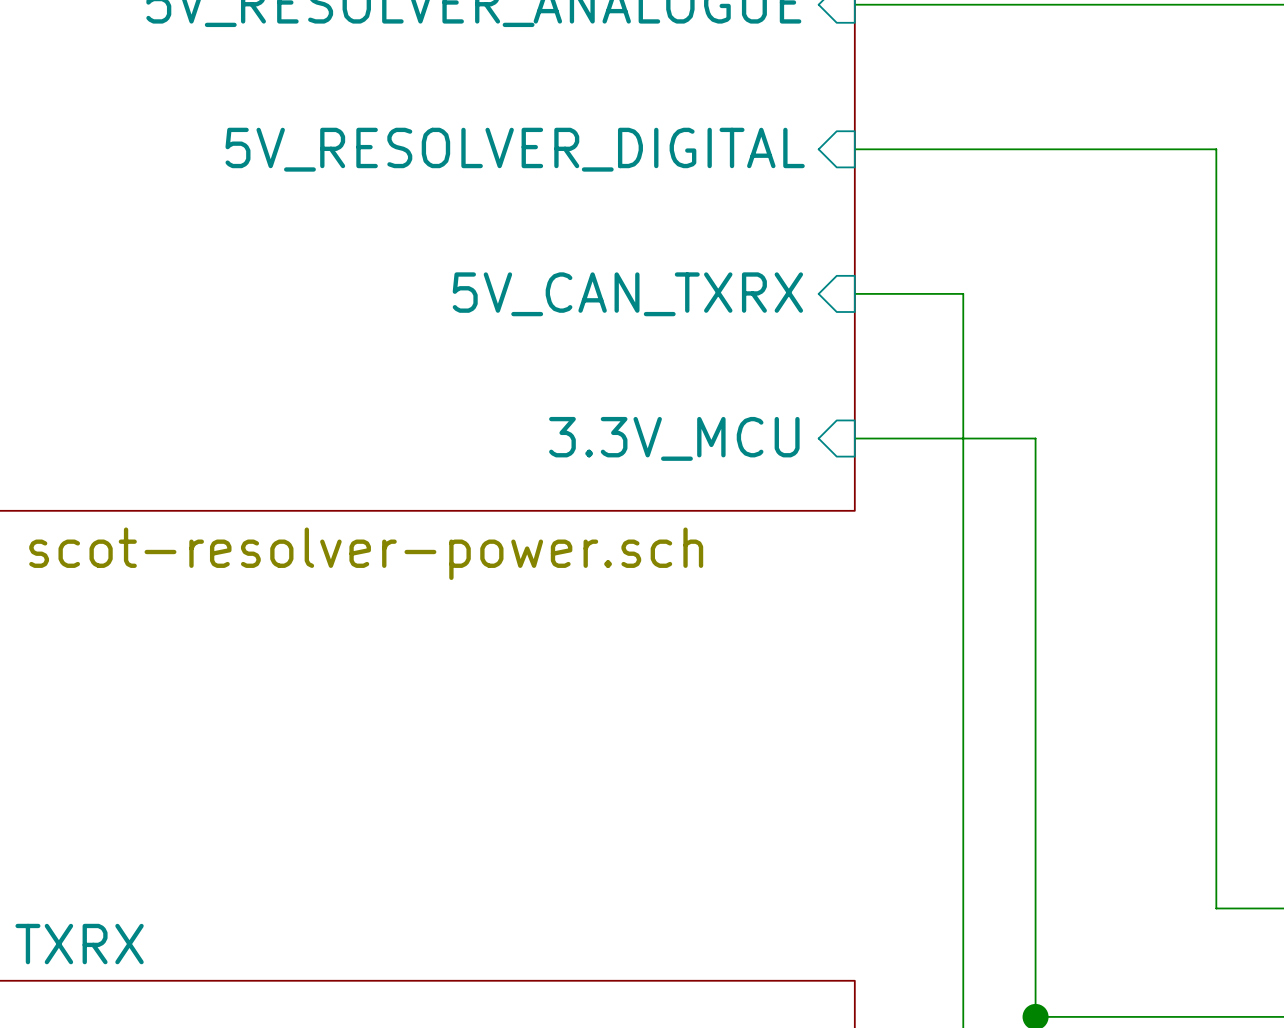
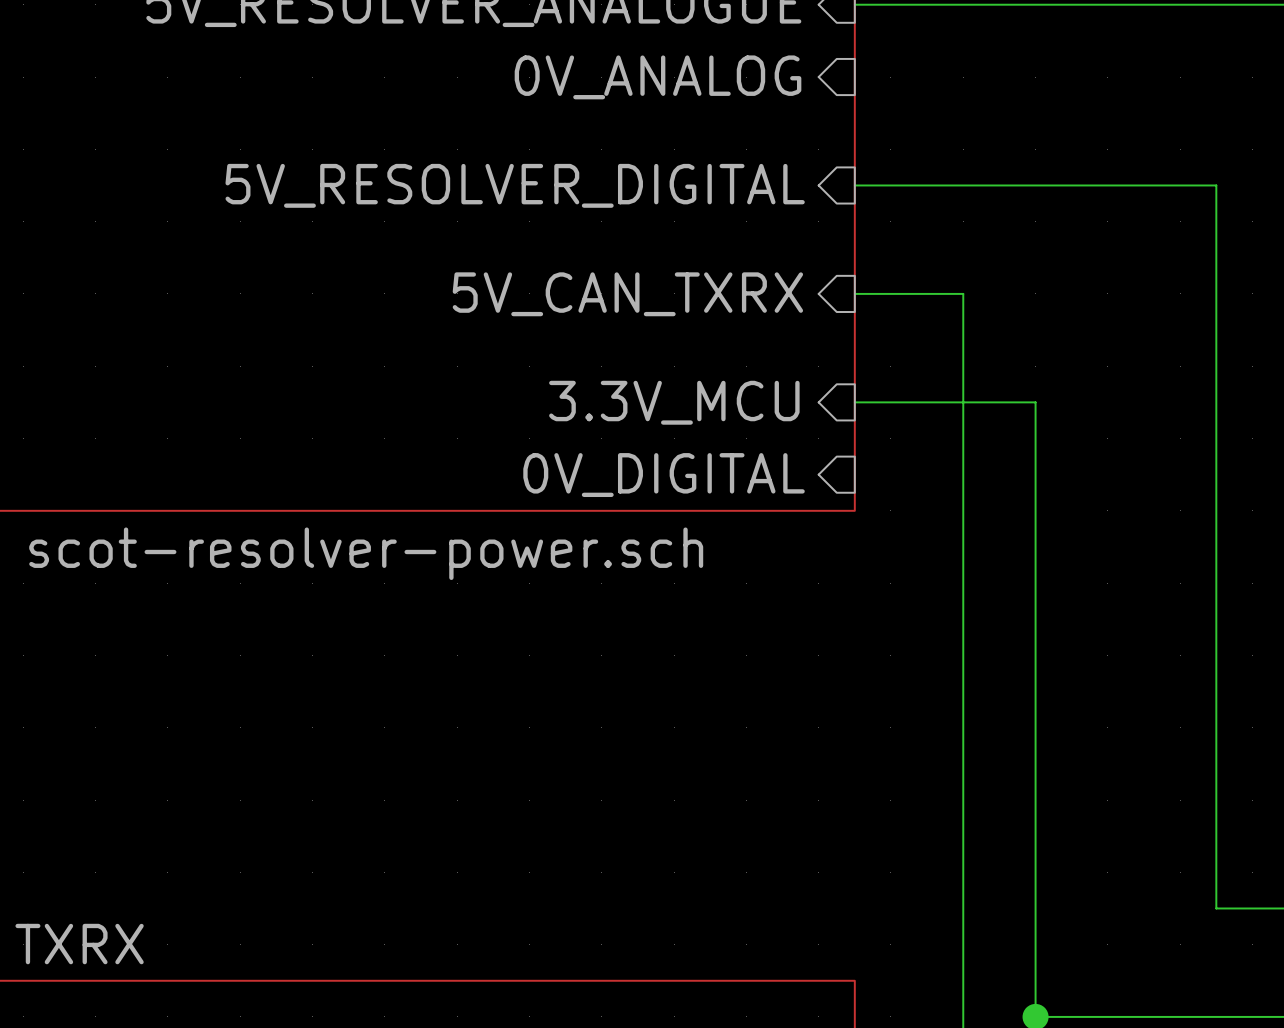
sheet pin: none -> 0V_ANALOG (658, 77)
sheet pin position: 5V_RESOLVER_DIGITAL (515, 149) -> 5V_RESOLVER_DIGITAL (515, 185)
wire: (854, 149) (1216, 149) (1216, 185) -> (854, 185) (1216, 185)
sheet pin position: 3.3V_MCU (674, 438) -> 3.3V_MCU (674, 402)
wire: (854, 438) (1035, 438) -> (854, 402) (1035, 402) (1035, 438)
sheet pin: none -> 0V_DIGITAL (664, 475)

